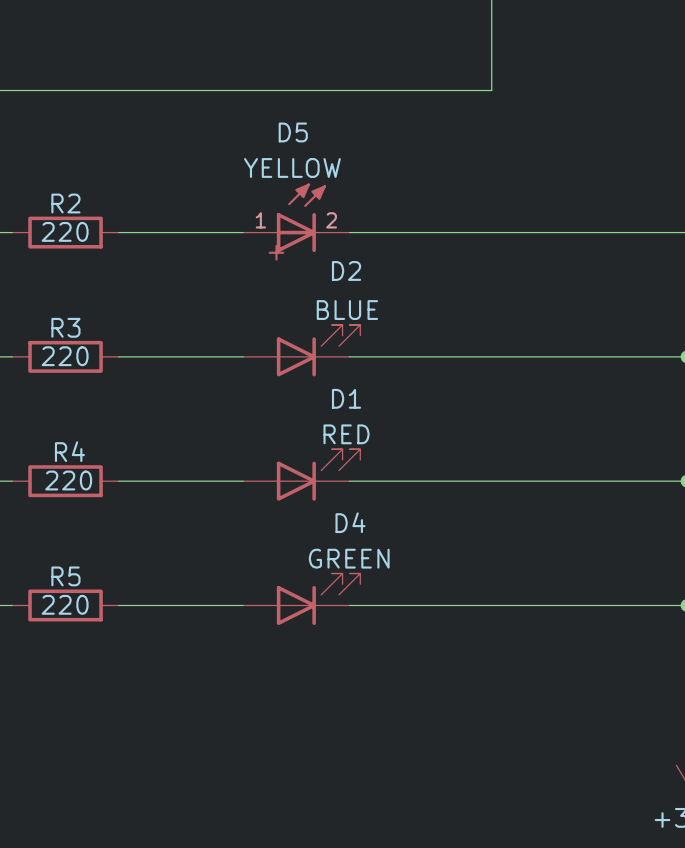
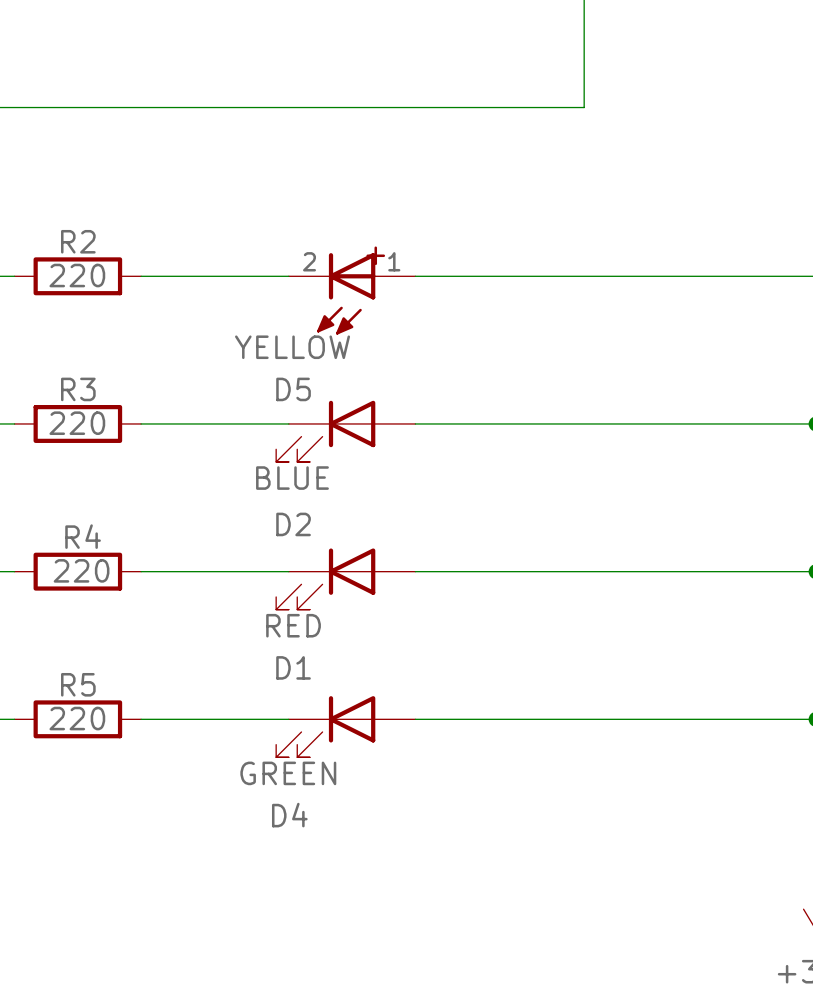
D5 name position: D5 (293, 132) -> D5 (293, 389)
D5 value position: YELLOW (292, 167) -> YELLOW (292, 347)
D5 rotation: 0° (301, 217) -> 180° (346, 293)
D2 rotation: 0° (318, 350) -> 180° (325, 431)
D1 rotation: 0° (318, 474) -> 180° (325, 579)
D4 rotation: 0° (318, 599) -> 180° (325, 726)

